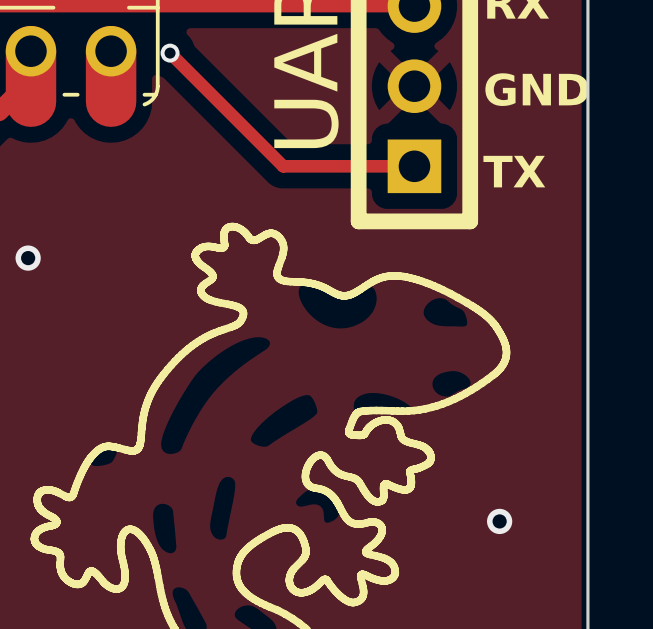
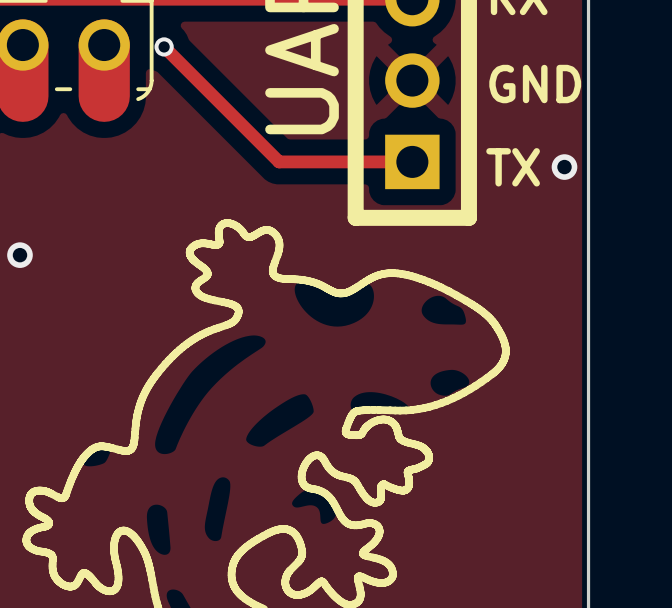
via: none -> (564, 167)
via: (499, 521) -> none

